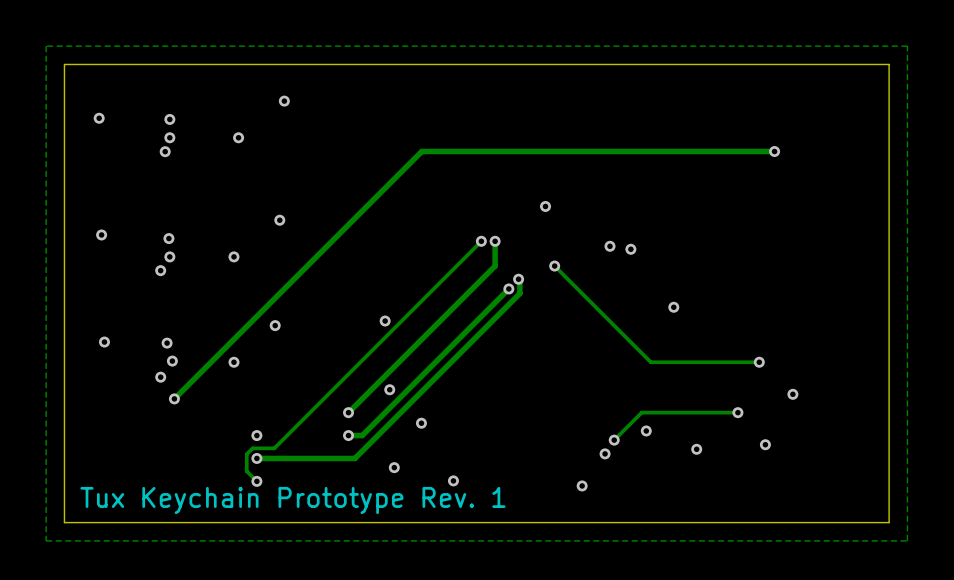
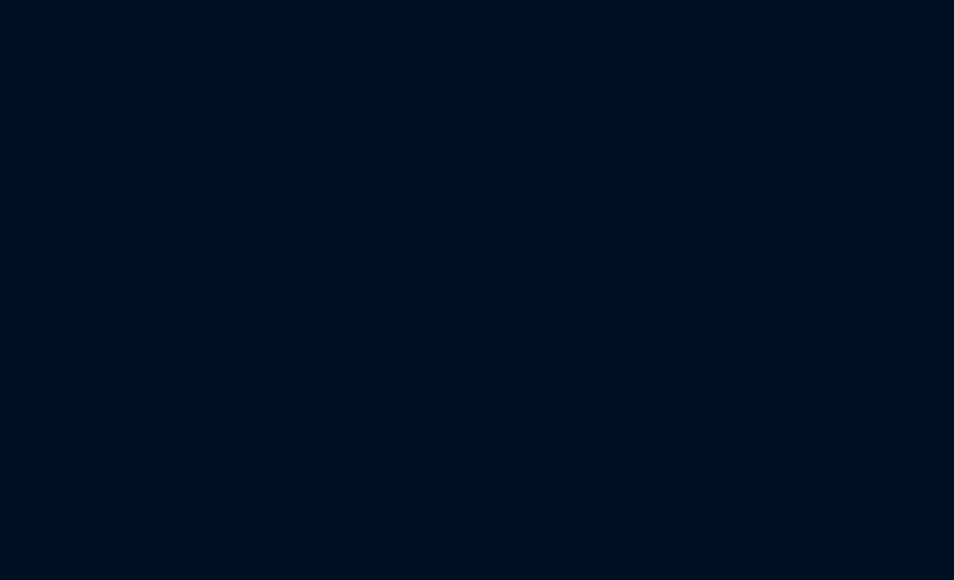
zone outline: (907, 46) (907, 540) (46, 540) (46, 46) (907, 46) -> none
board edge: (889, 64) (64, 64) (64, 522) (889, 522) (889, 64) -> none
via: (284, 101) -> none
via: (99, 118) -> none
via: (169, 119) -> none
via: (169, 137) -> none
via: (238, 137) -> none
via: (165, 151) -> none
track: (774, 151) (421, 151) (174, 398) -> none
via: (774, 151) -> none
via: (545, 206) -> none
via: (279, 220) -> none
via: (101, 234) -> none
via: (168, 238) -> none
track: (481, 241) (274, 448) (252, 448) (246, 454) (246, 471) (256, 481) -> none
via: (481, 241) -> none
track: (495, 241) (495, 266) (348, 412) -> none
via: (495, 241) -> none
via: (610, 246) -> none
via: (630, 249) -> none
via: (169, 256) -> none
via: (233, 256) -> none
track: (554, 266) (650, 362) (759, 362) -> none
via: (554, 266) -> none
via: (160, 270) -> none
track: (518, 279) (519, 293) (354, 458) (256, 458) -> none
via: (518, 279) -> none
track: (508, 288) (362, 435) (348, 435) -> none
via: (508, 288) -> none
via: (673, 307) -> none
via: (385, 321) -> none
via: (275, 325) -> none
via: (104, 342) -> none
via: (167, 343) -> none
via: (172, 361) -> none
via: (233, 362) -> none
via: (759, 362) -> none
via: (160, 377) -> none
via: (389, 389) -> none
via: (792, 394) -> none
via: (174, 398) -> none
via: (348, 412) -> none
track: (737, 412) (641, 412) (614, 440) -> none
via: (737, 412) -> none
via: (421, 423) -> none
via: (646, 430) -> none
via: (256, 435) -> none
via: (348, 435) -> none
via: (614, 440) -> none
via: (765, 444) -> none
via: (696, 449) -> none
via: (605, 453) -> none
via: (256, 458) -> none
via: (394, 467) -> none
via: (453, 480) -> none
via: (256, 481) -> none
via: (582, 485) -> none
text: Tux Keychain Prototype Rev. 1 (292, 500) -> none

